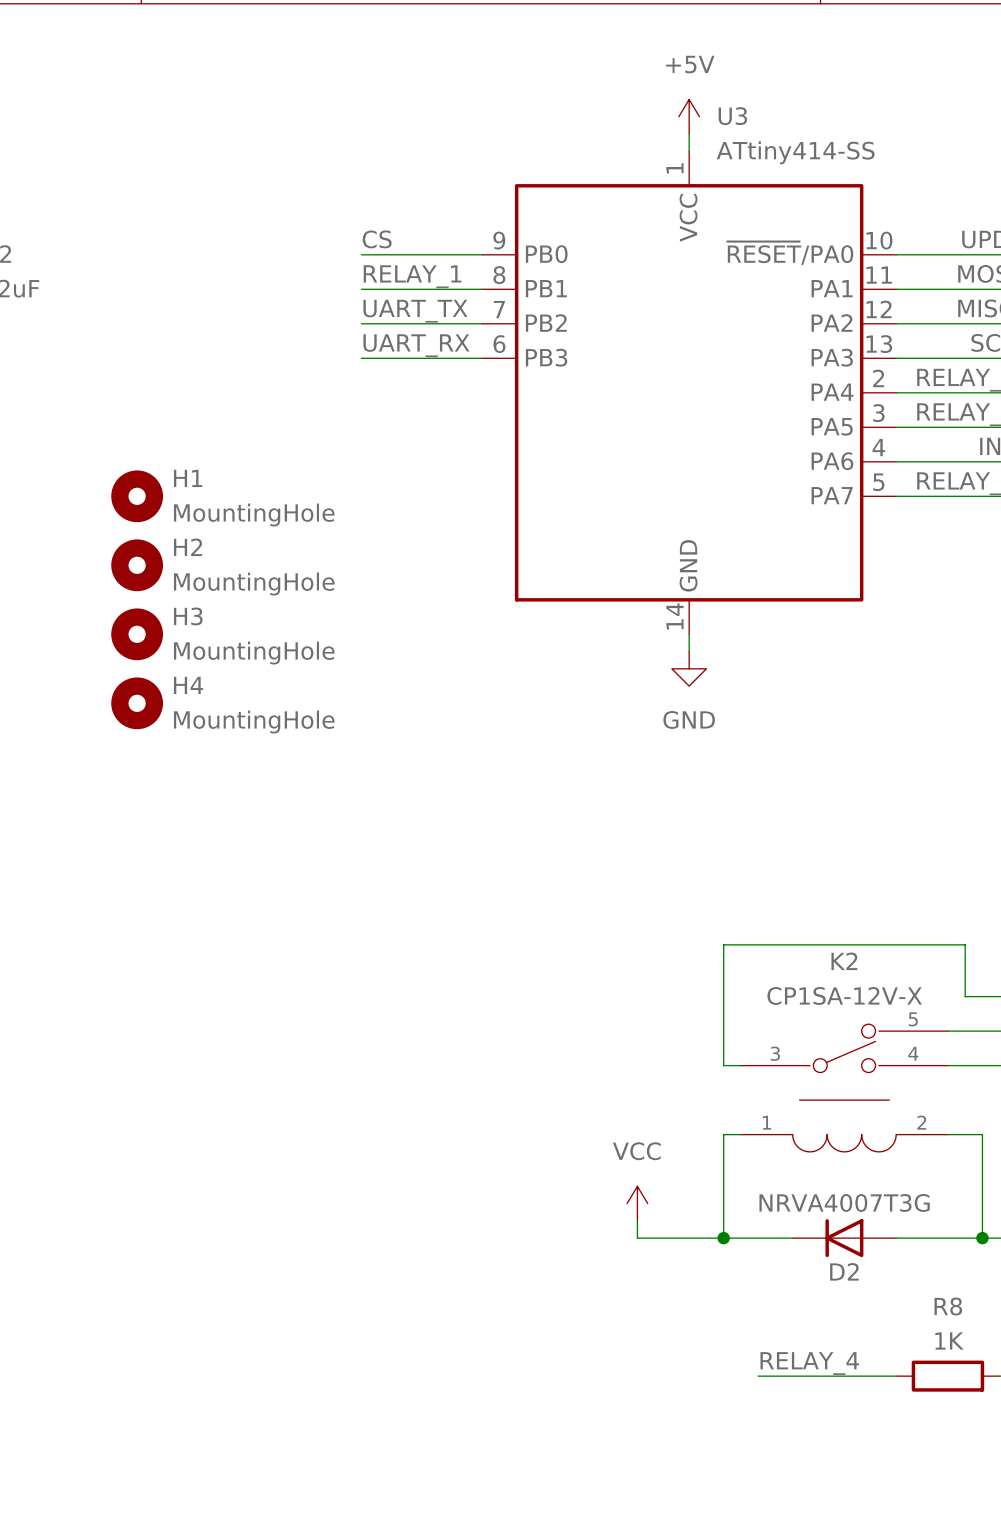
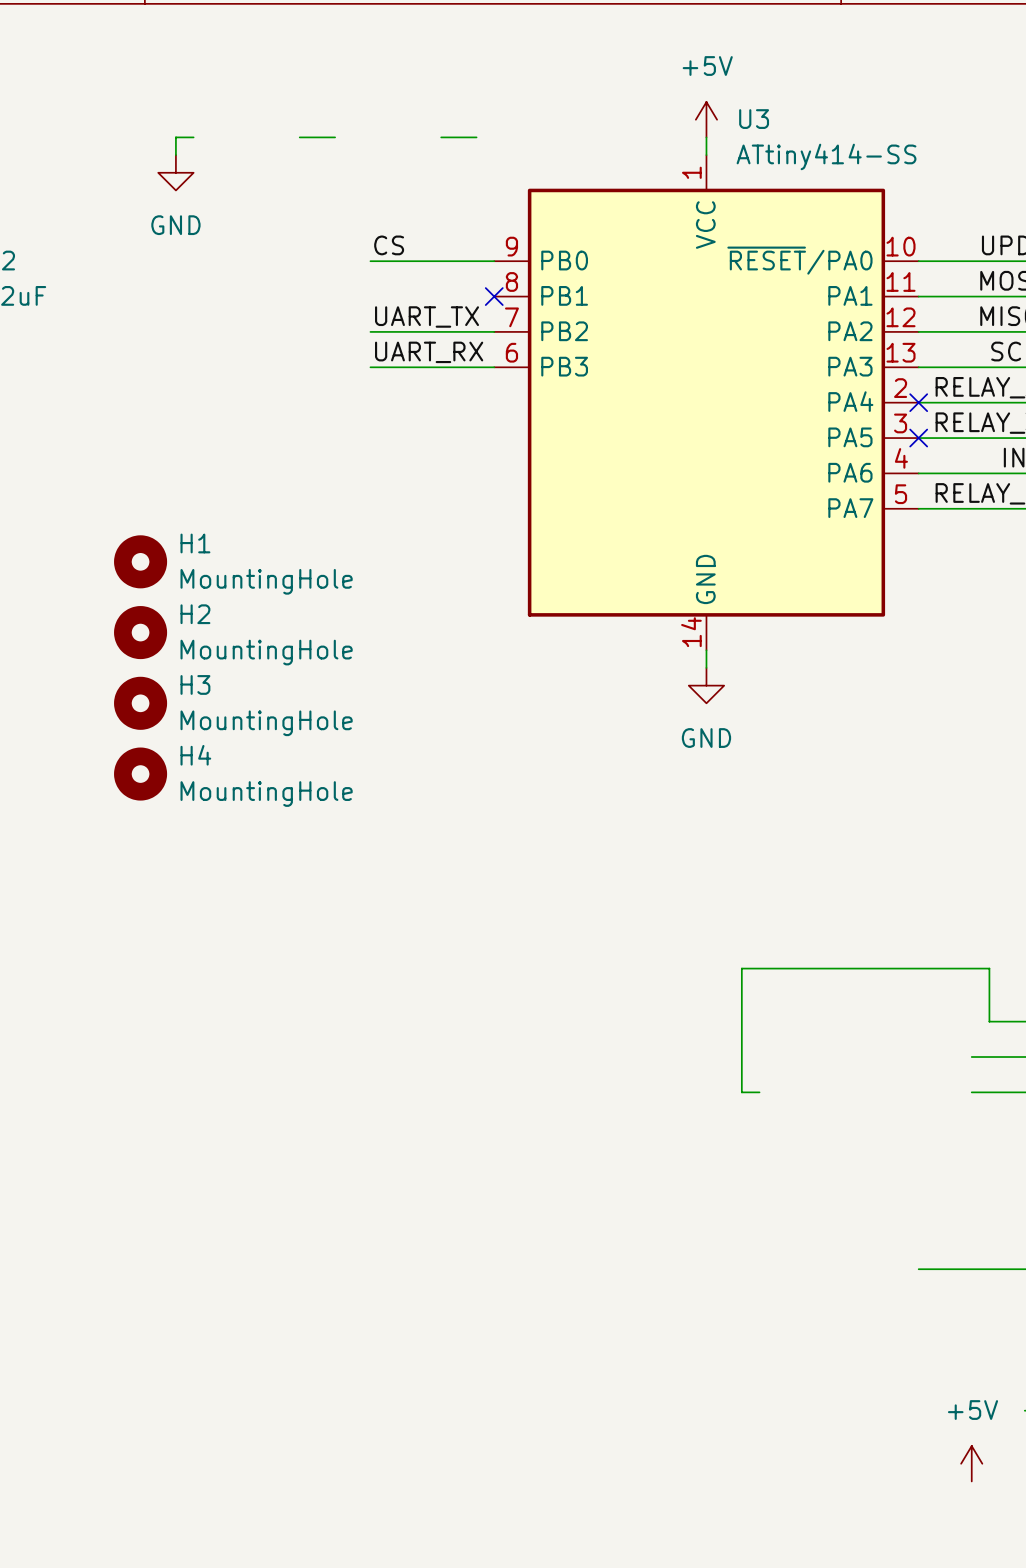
wire: none -> (193, 137) (175, 137) (175, 155)
wire: none -> (299, 137) (335, 137)
wire: none -> (441, 137) (476, 137)
power symbol: none -> GND (175, 172)
label: RELAY_1 (412, 276) -> none
wire: (361, 289) (482, 289) -> none
no-connect mark: none -> (494, 296)
no-connect mark: none -> (918, 402)
no-connect mark: none -> (918, 438)
H1 position: (137, 496) -> (140, 561)
H2 position: (137, 565) -> (140, 632)
H3 position: (137, 634) -> (140, 703)
H4 position: (137, 703) -> (140, 774)
K2: CP1SA-12V-X (844, 1088) -> none
wire: (740, 1134) (723, 1134) (723, 1238) -> none
wire: (947, 1134) (982, 1134) (982, 1238) -> none
power symbol: VCC (637, 1203) -> none
wire: (637, 1220) (637, 1238) (792, 1238) -> none
junction: (723, 1238) -> none
D2: NRVA4007T3G (844, 1238) -> none
junction: (982, 1238) -> none
label: RELAY_4 (809, 1363) -> none
wire: (758, 1376) (896, 1376) -> none
R8: 1K (947, 1376) -> none
power symbol: none -> +5V (971, 1463)

